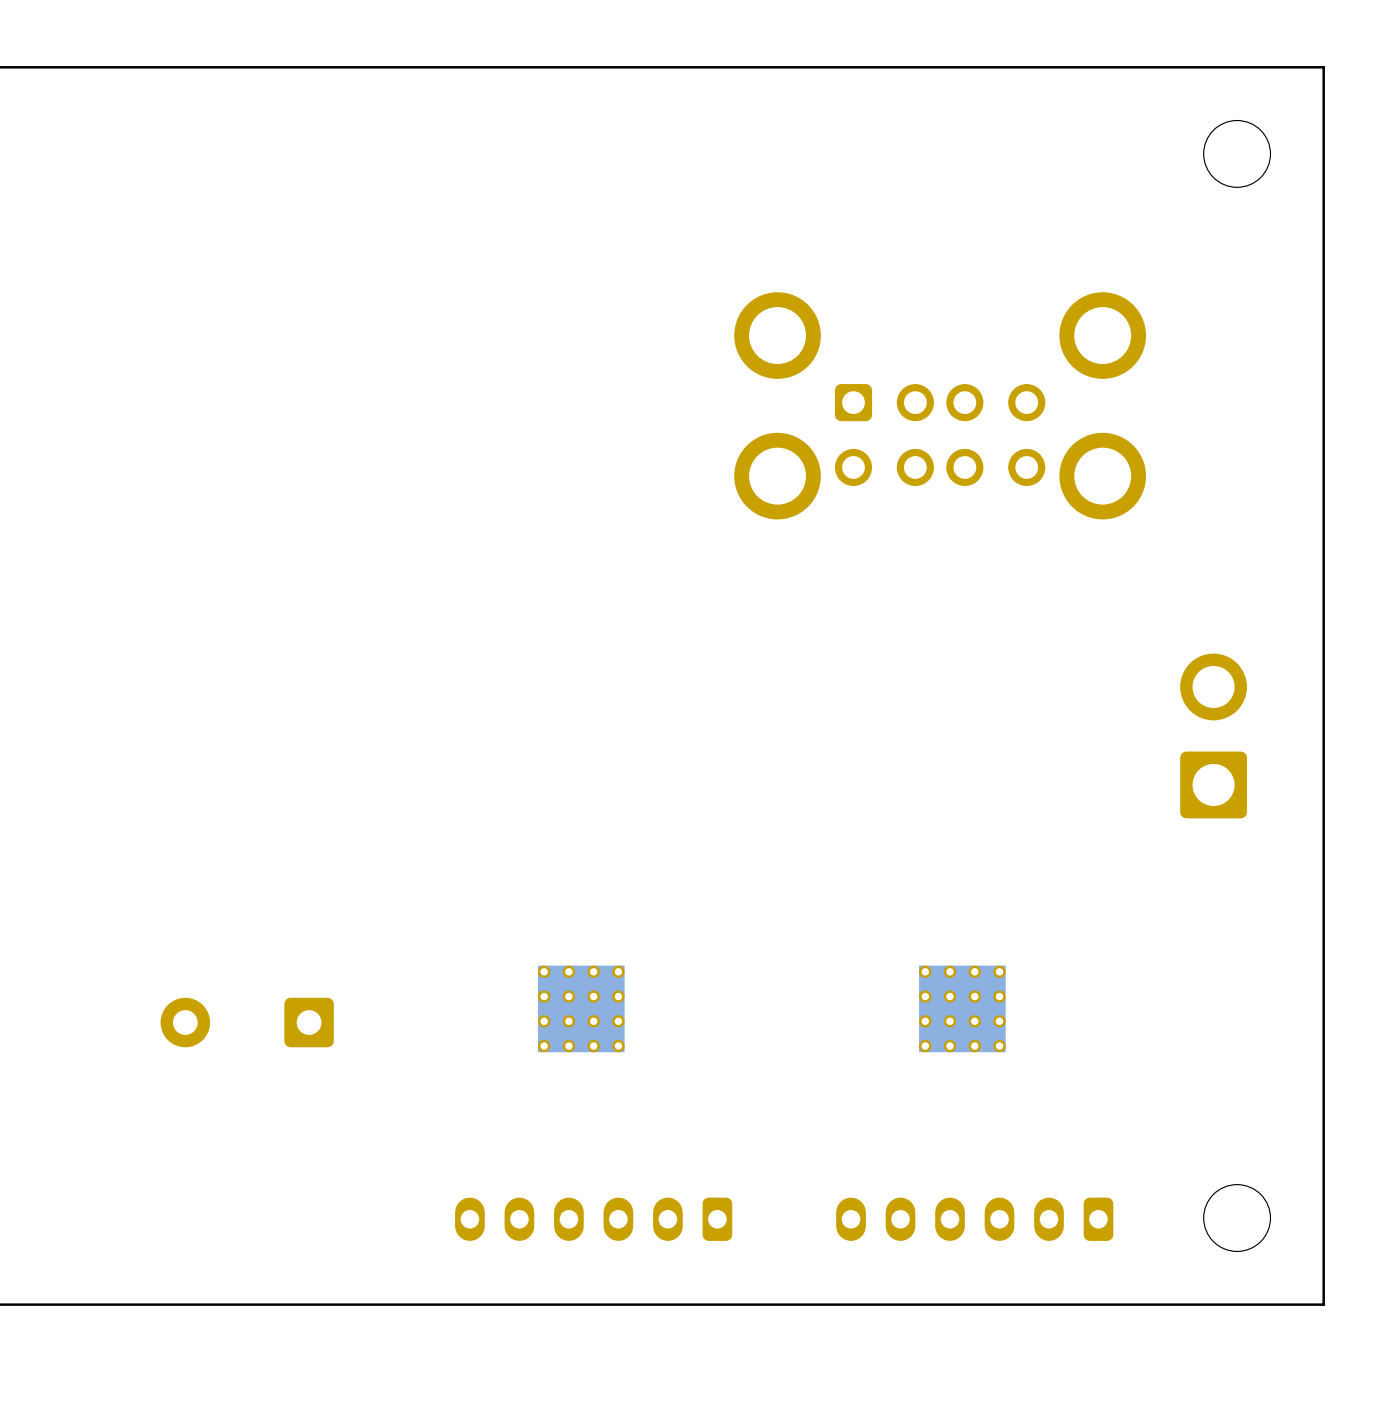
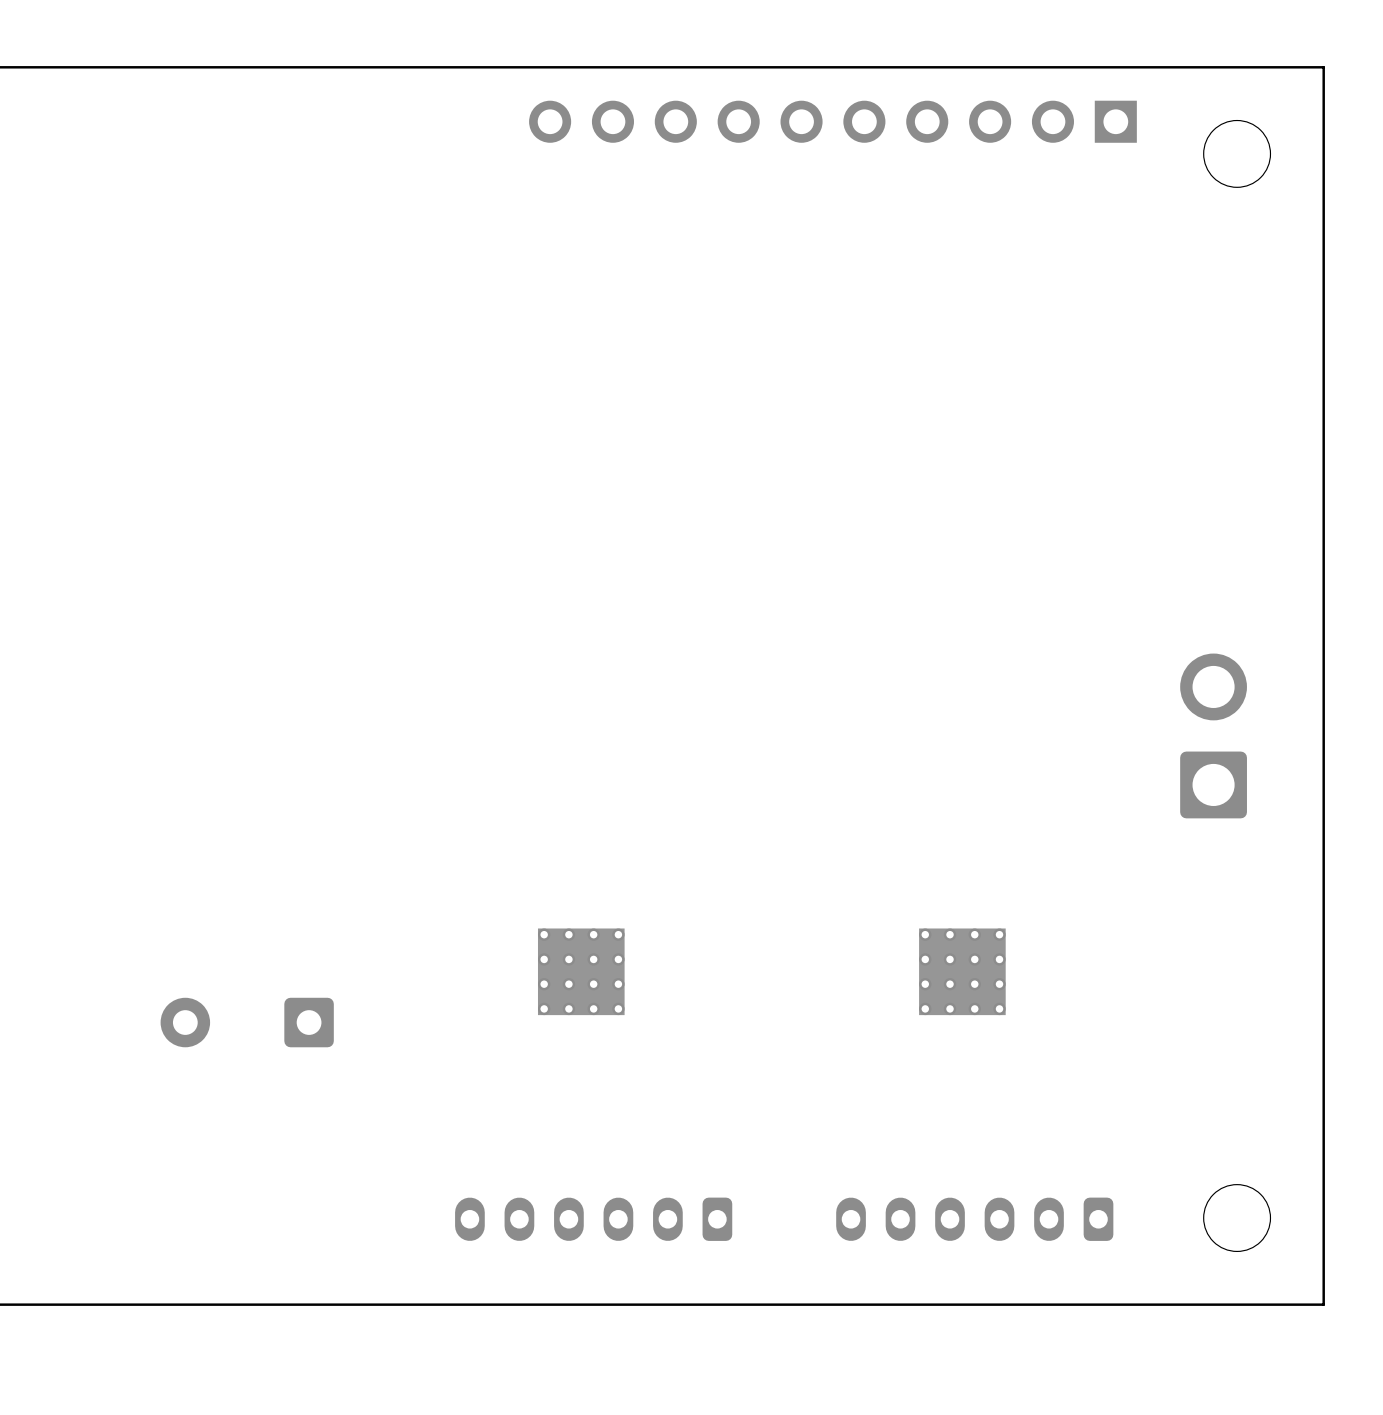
part: none -> (832, 121)
part: (940, 405) -> none
part position: (581, 1008) -> (581, 971)
part position: (962, 1008) -> (962, 971)

